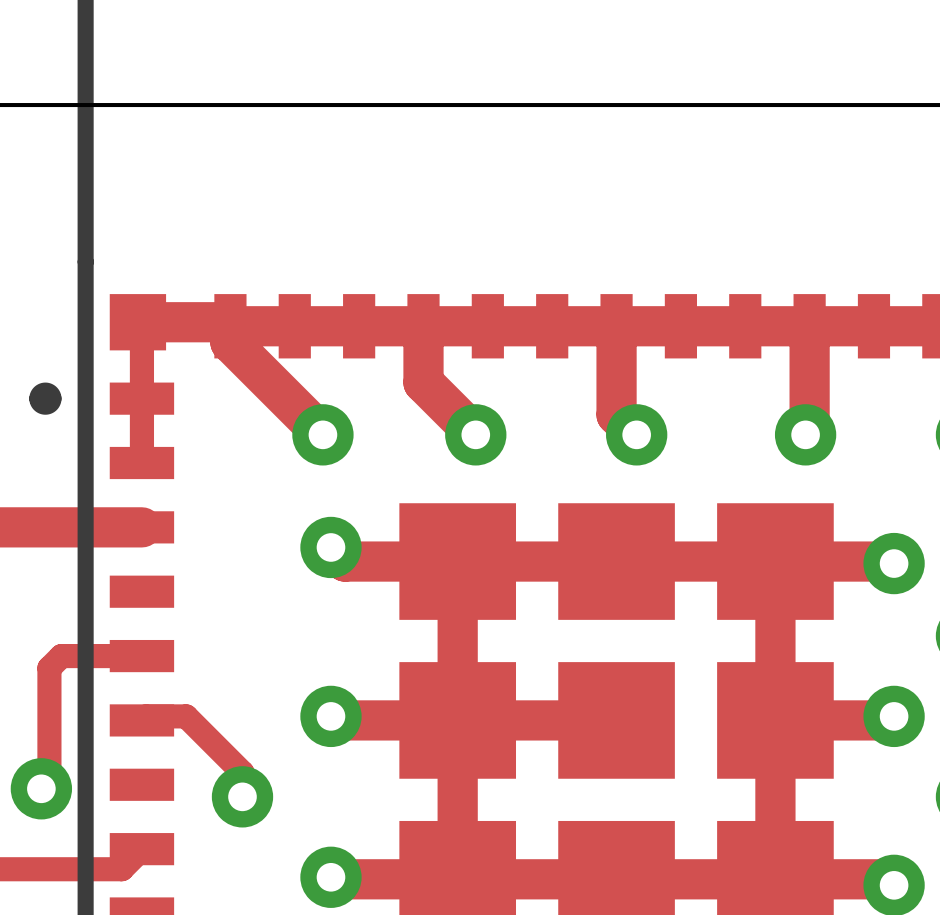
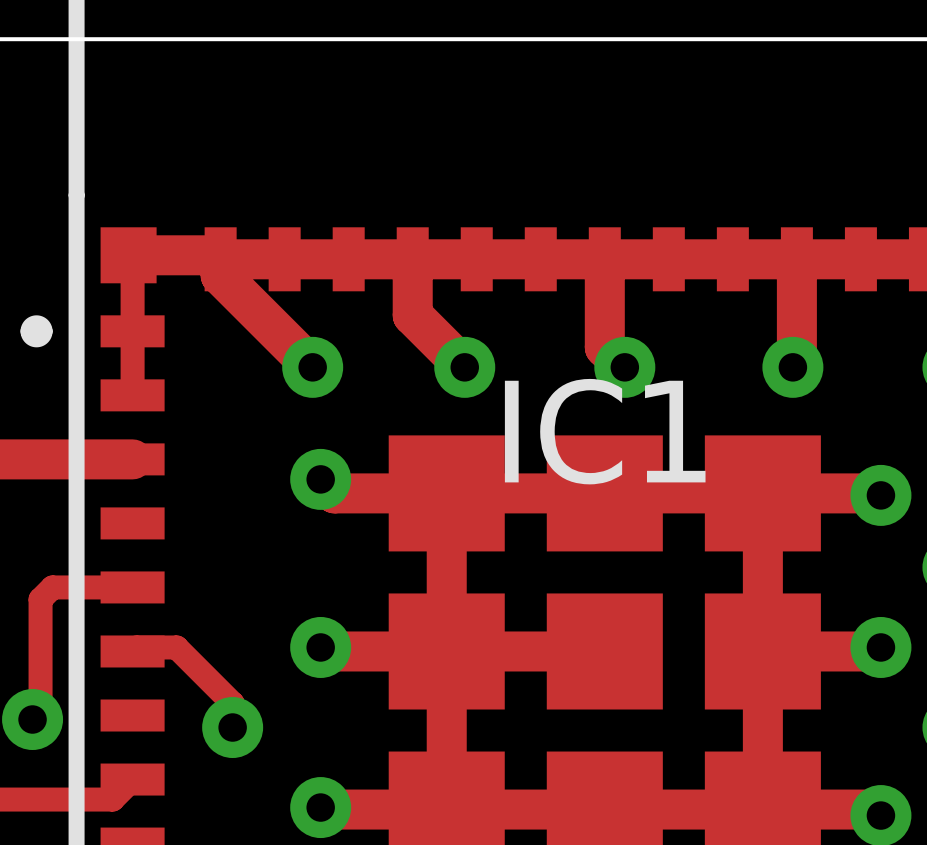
IC1 name: none -> IC1 (605, 431)

